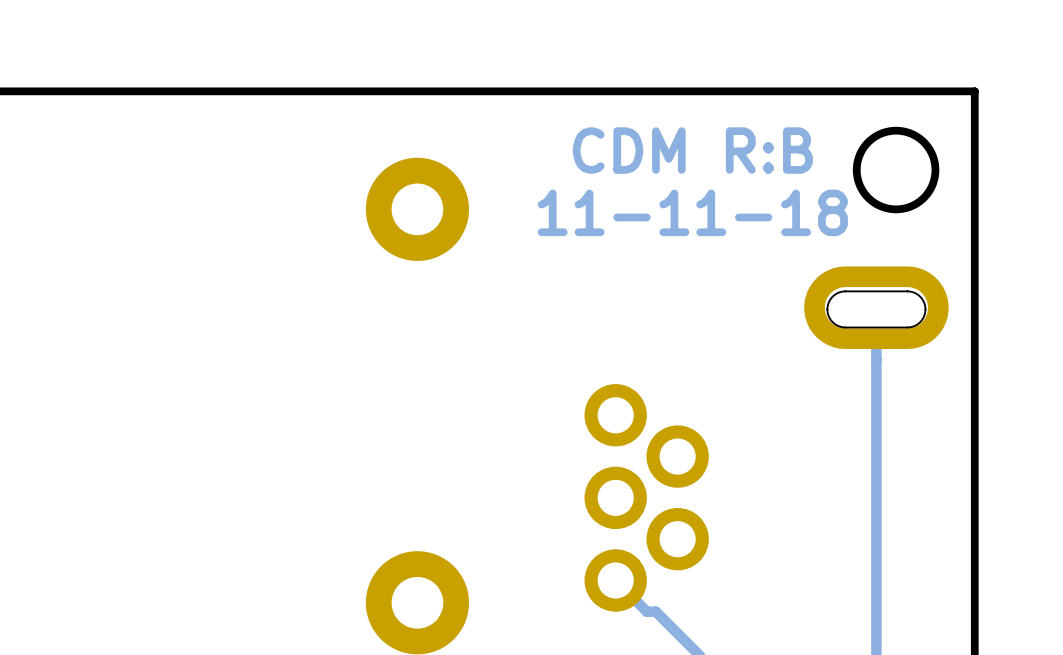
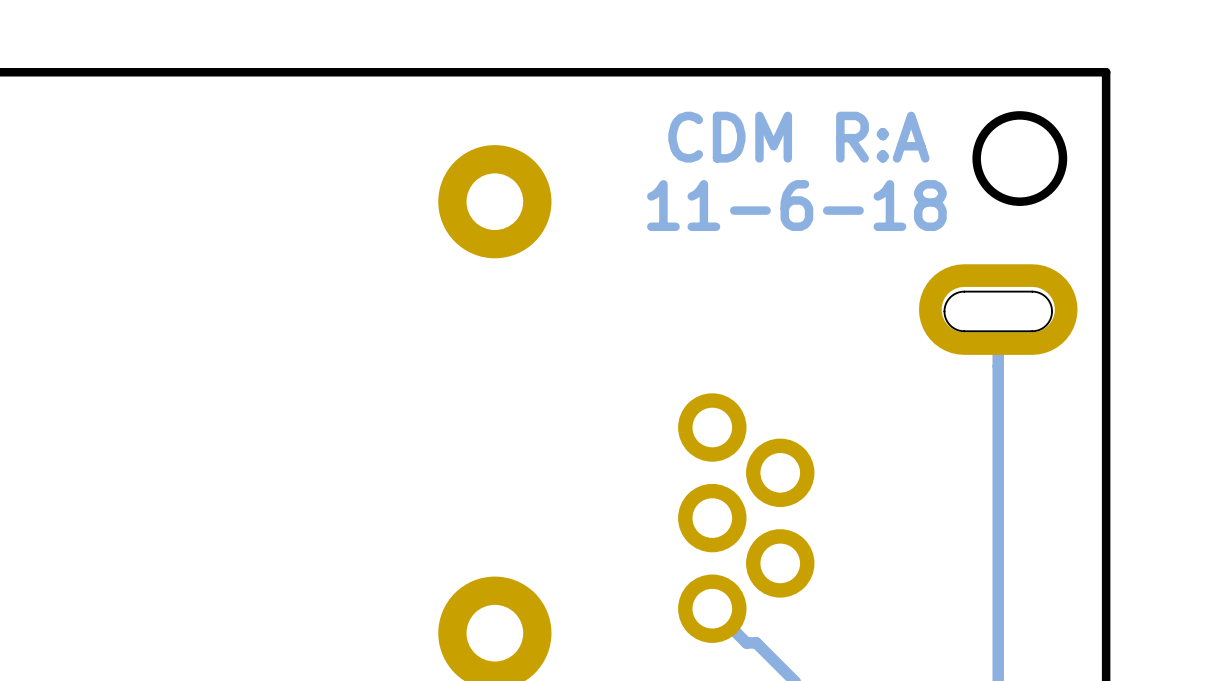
text: CDM R:B (692, 150) -> CDM R:A (798, 137)
text: 11-11-18 (692, 212) -> 11-6-18 (796, 205)

